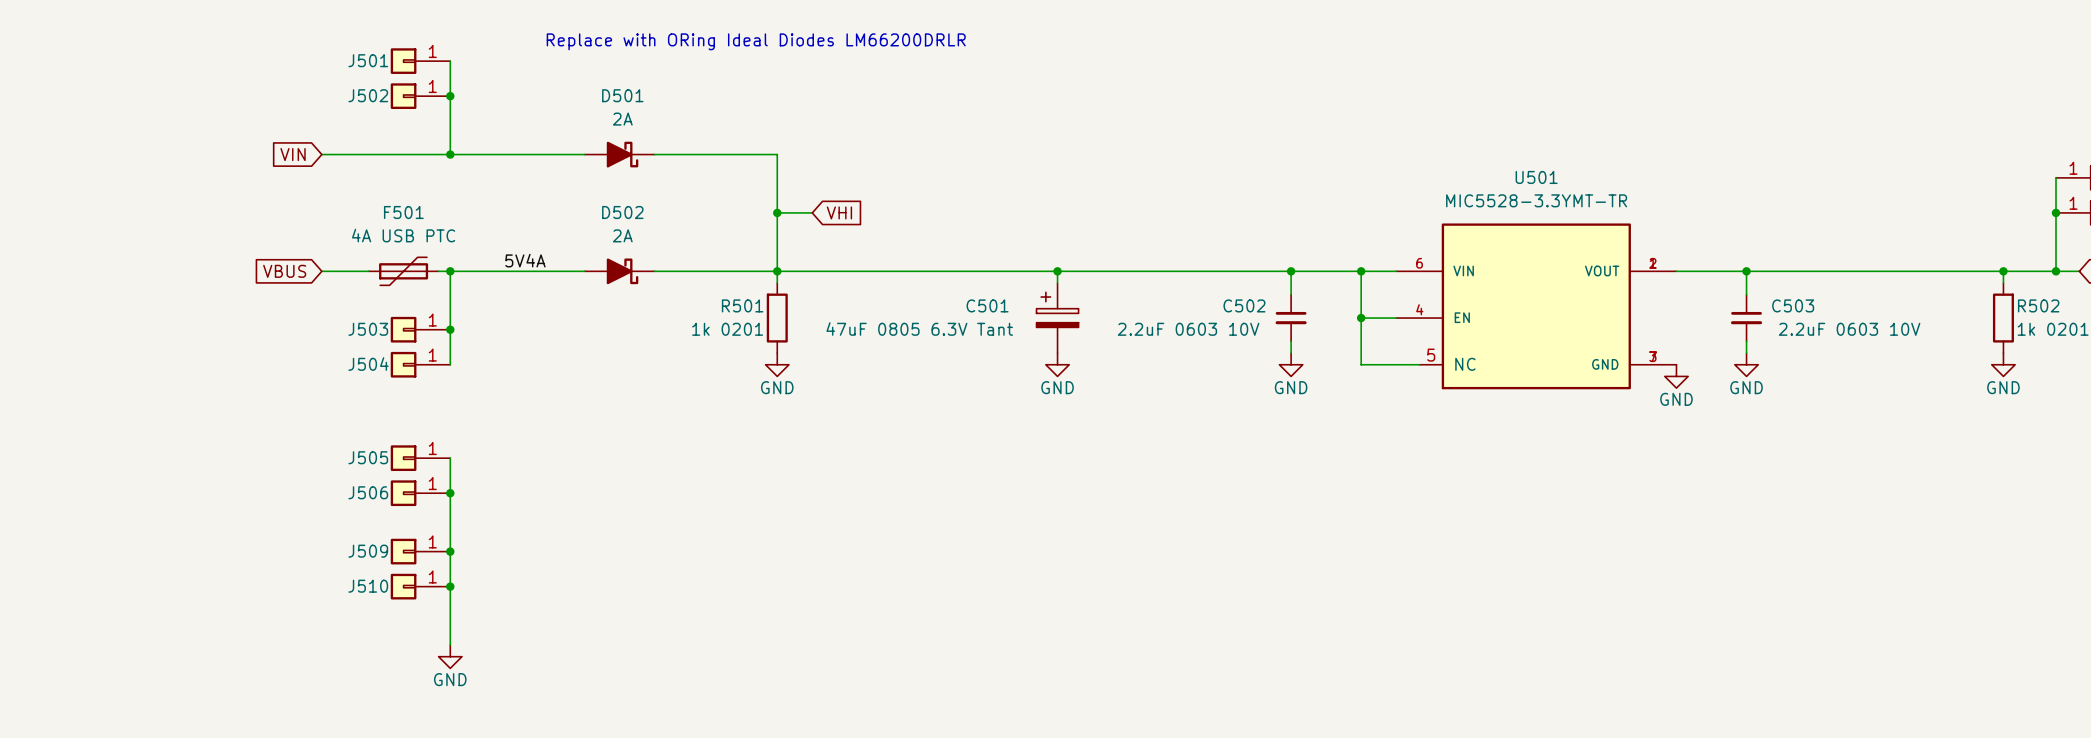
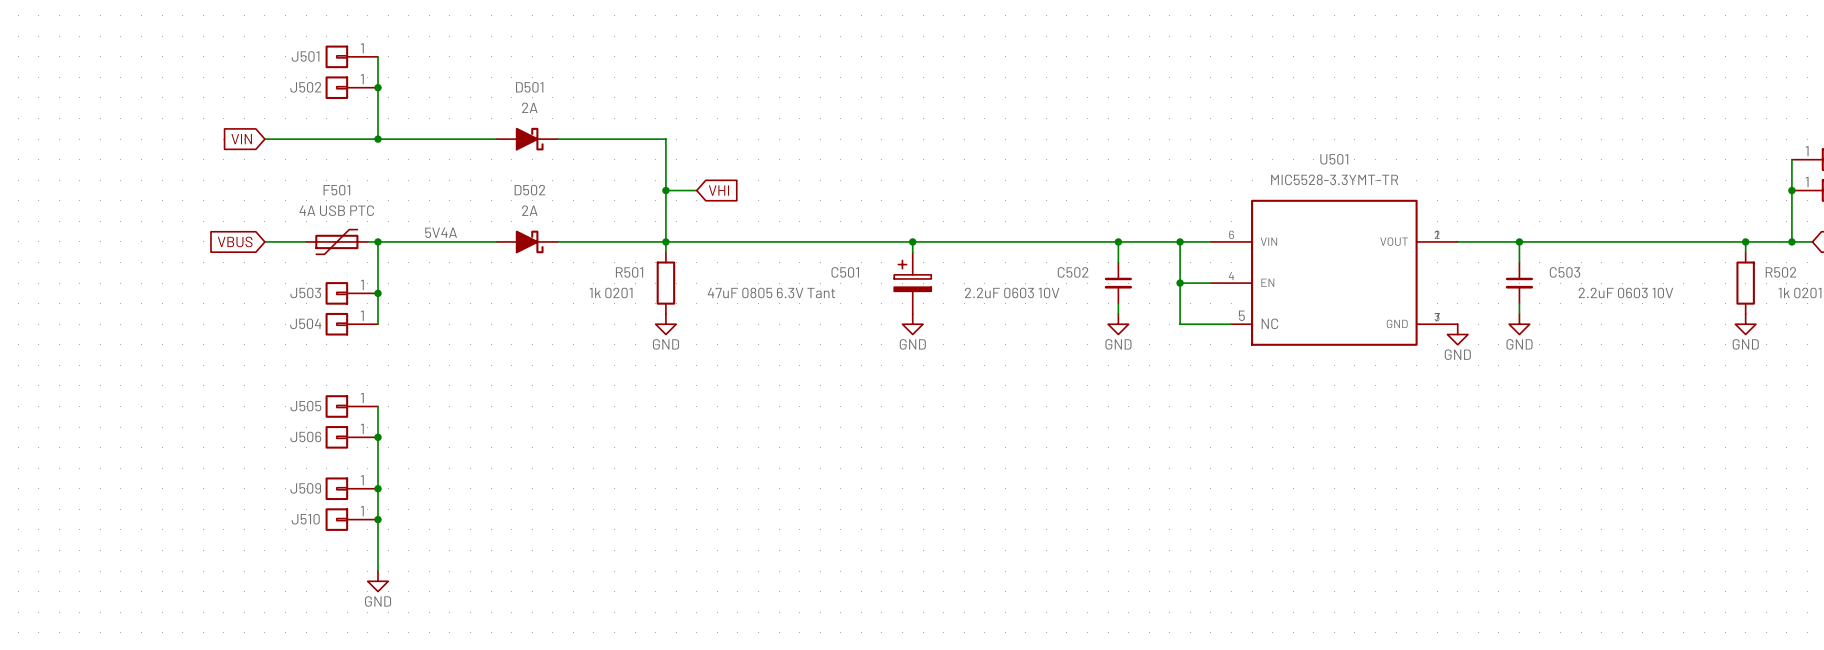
text: Replace with ORing Ideal Diodes LM66200DRLR (756, 41) -> none

